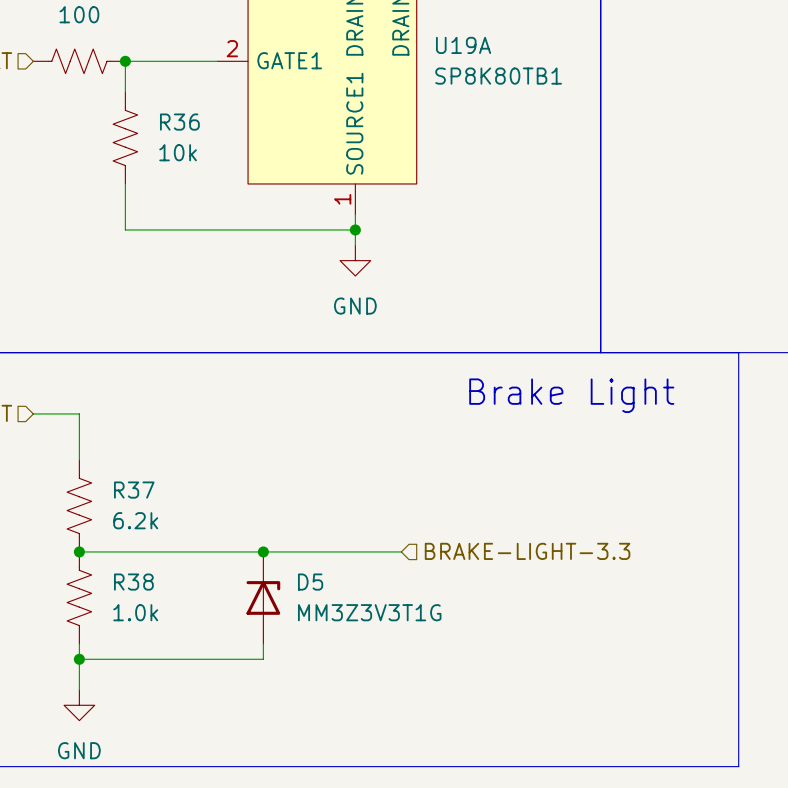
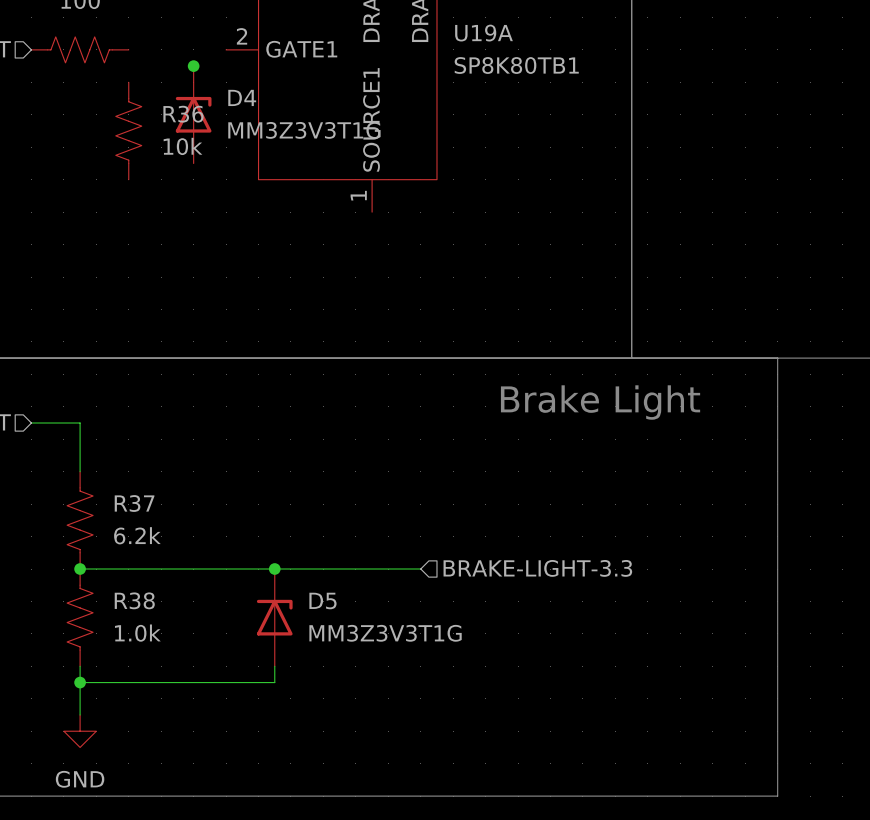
junction position: (125, 61) -> (193, 66)
wire: (217, 61) (125, 61) (125, 91) -> none
D4: none -> MM3Z3V3T1G (193, 114)
wire: (125, 183) (125, 229) (355, 229) -> none
wire: (355, 214) (355, 245) -> none
junction: (355, 229) -> none
power symbol: GND (355, 260) -> none

